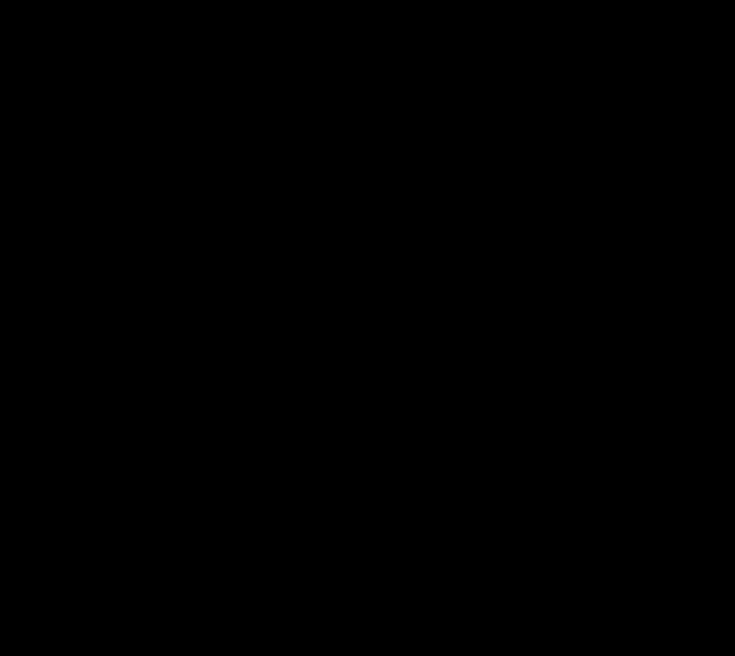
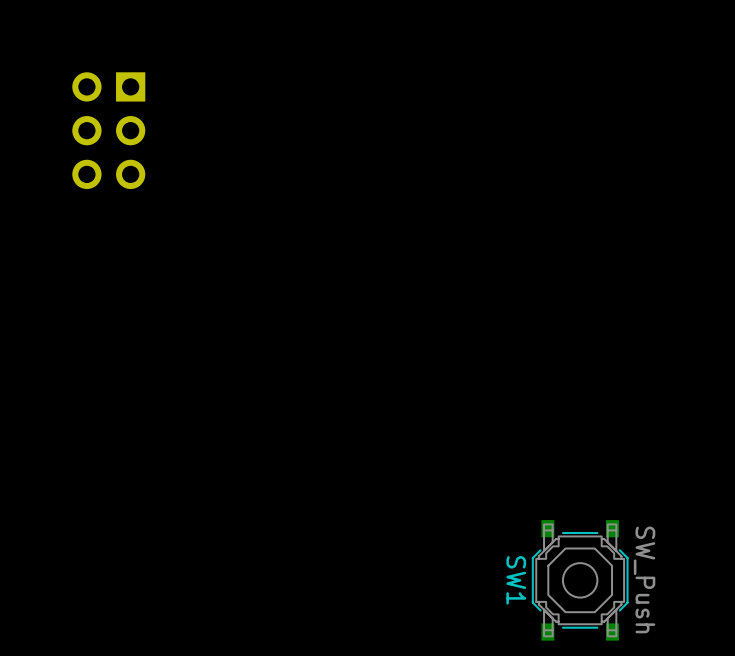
part: none -> (108, 130)
SW1: none -> SW_Push (580, 580)

